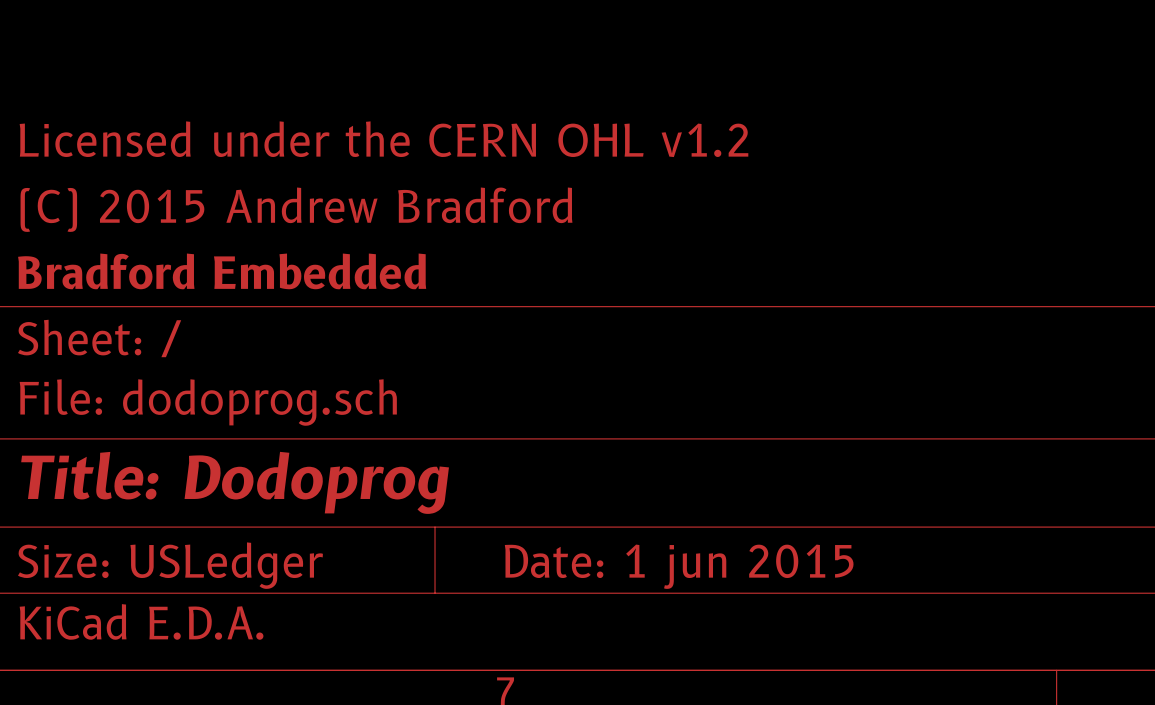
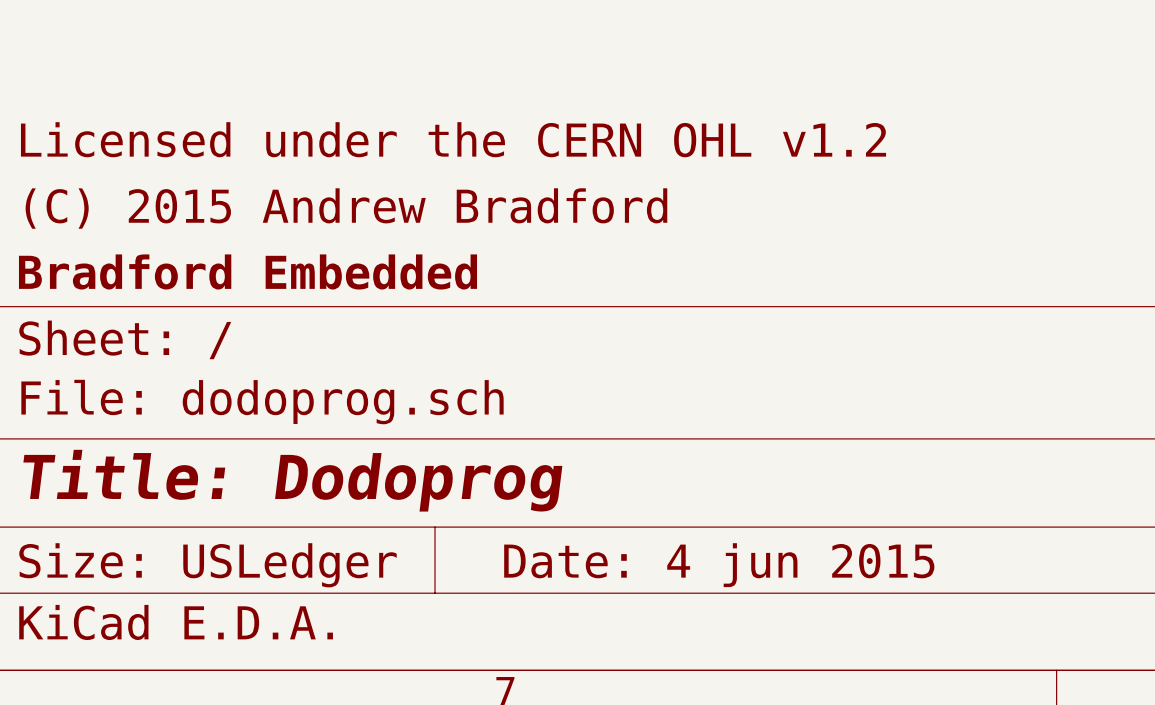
title block: Date: 1 jun 2015 (679, 566) -> Date: 4 jun 2015 (719, 565)

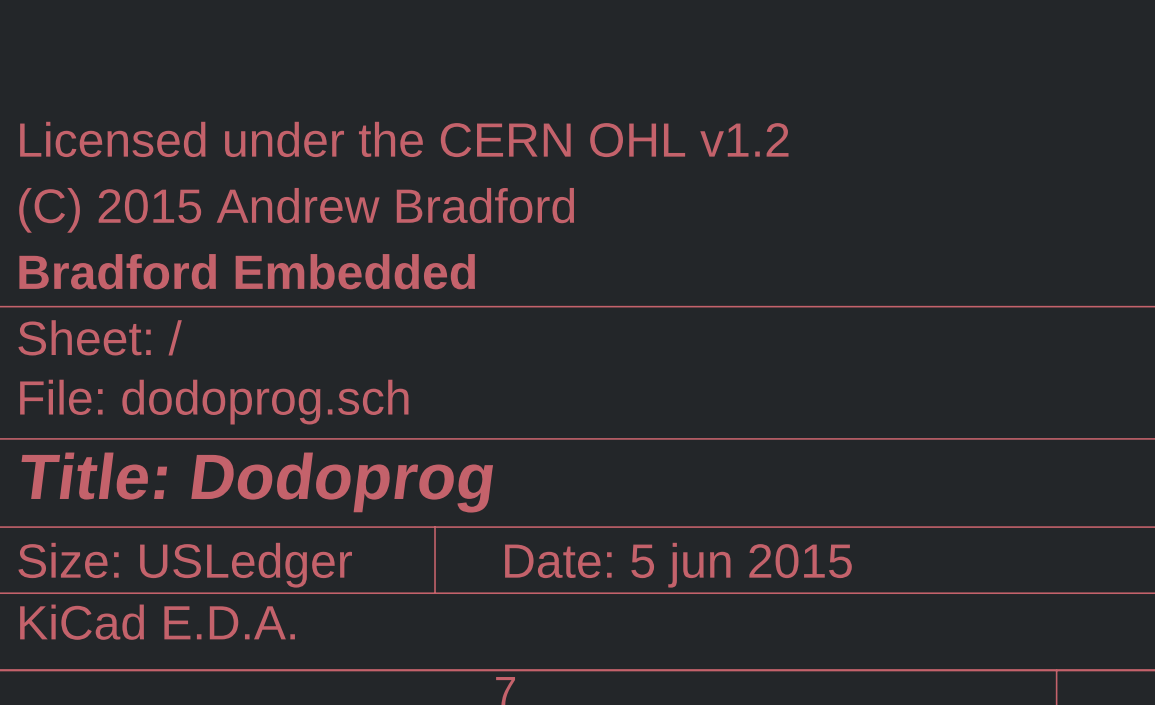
title block: Date: 4 jun 2015 (719, 565) -> Date: 5 jun 2015 (678, 565)

